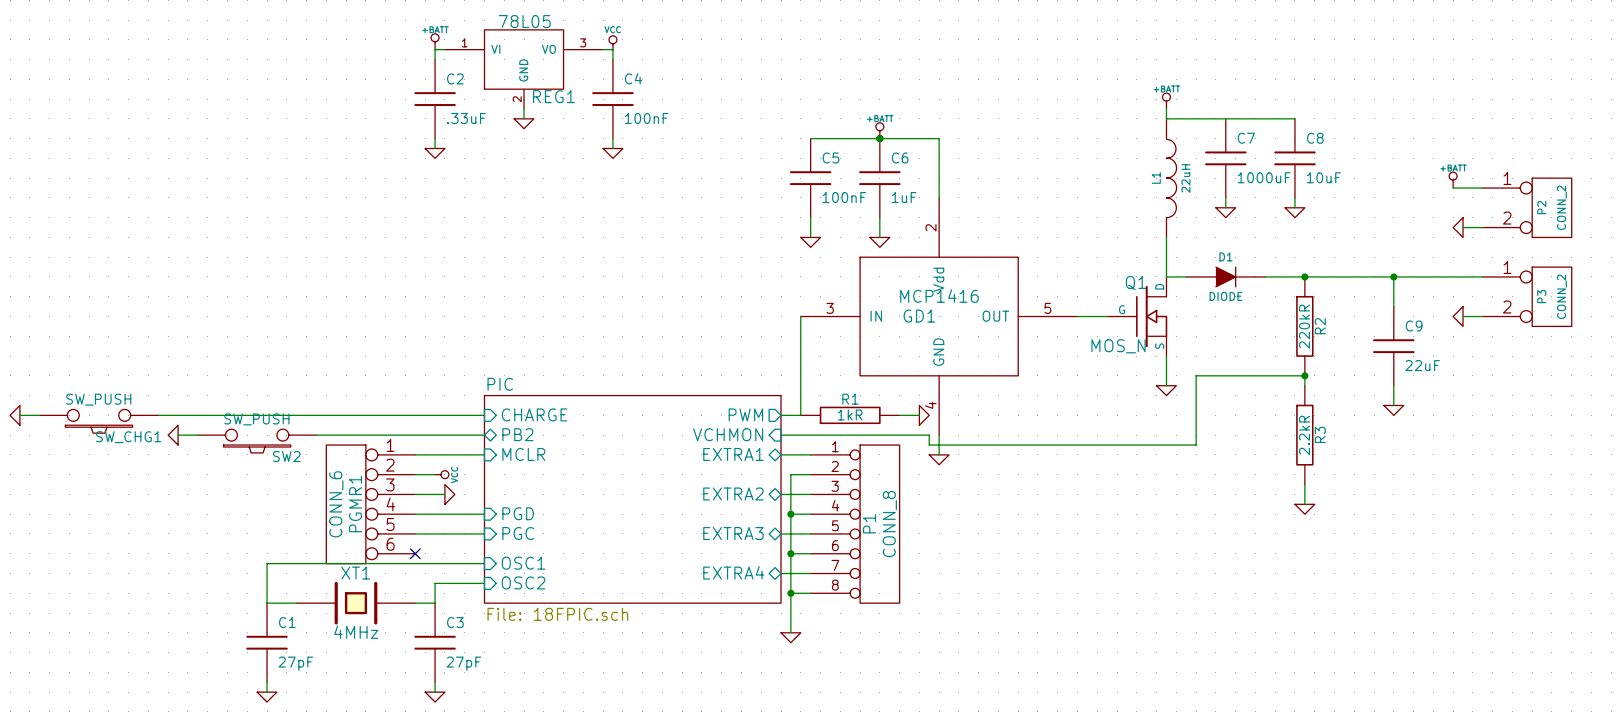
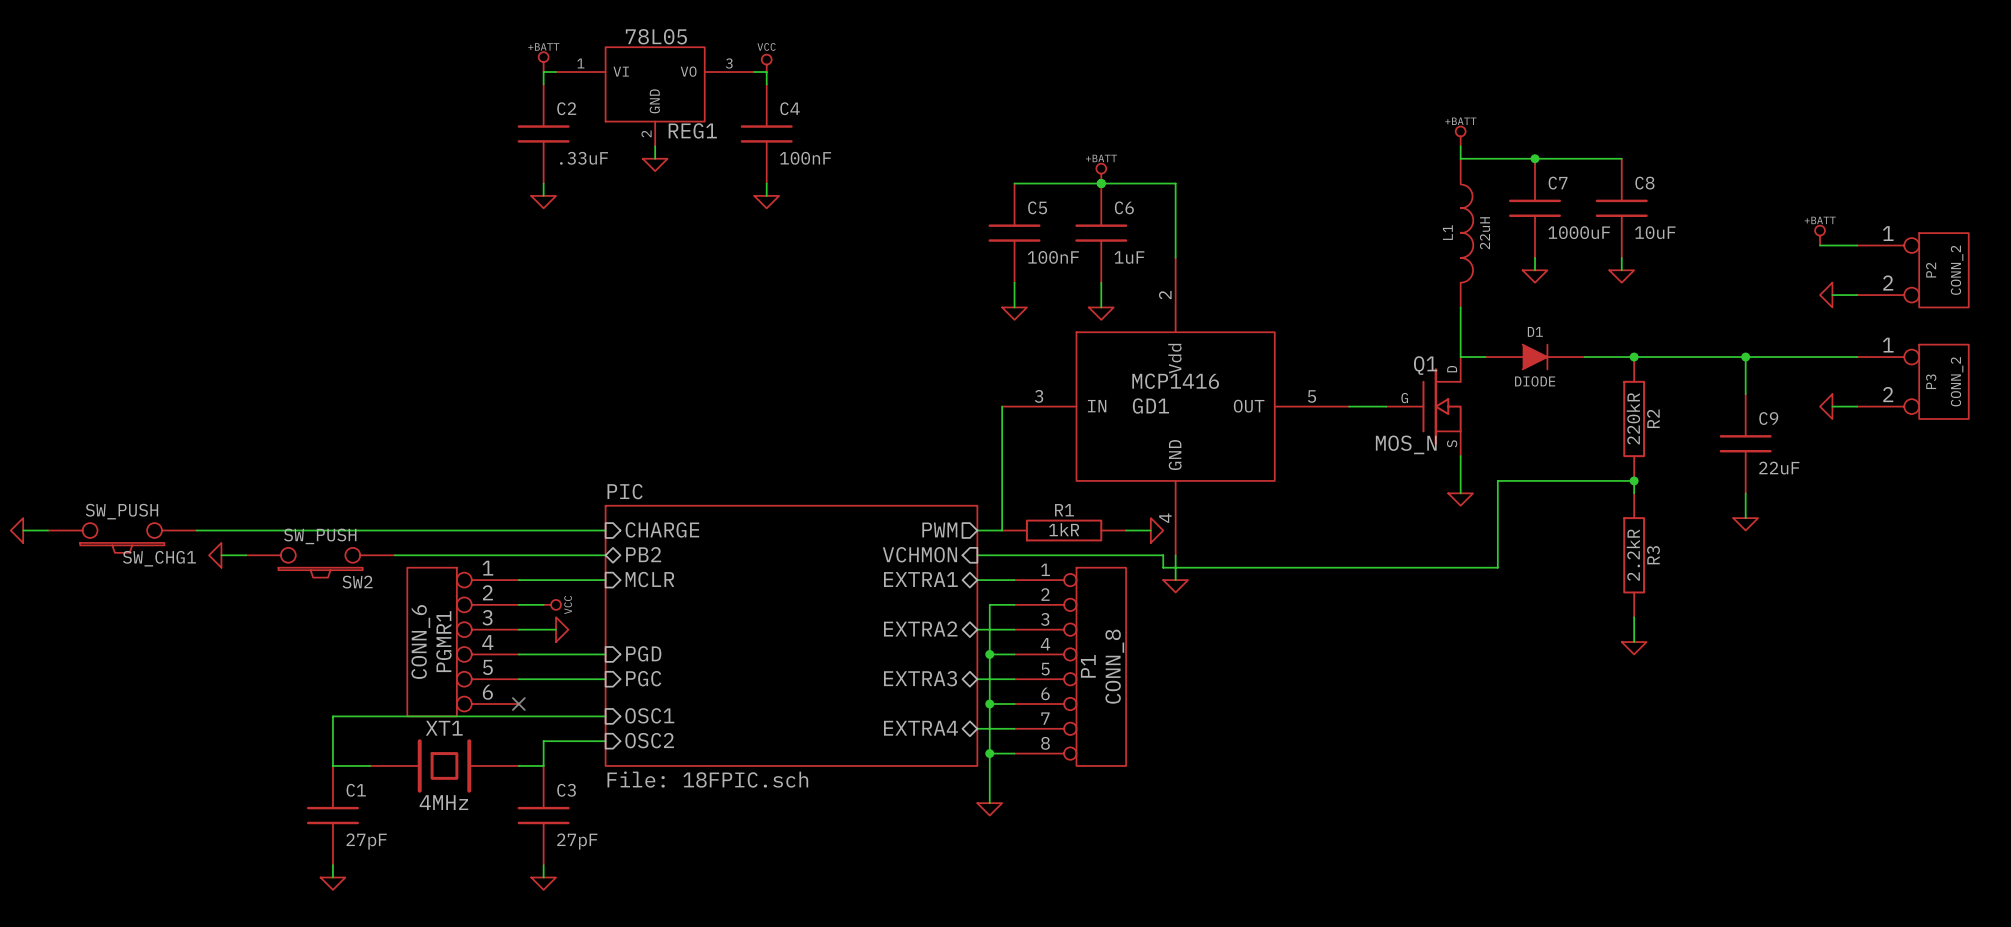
junction: none -> (1535, 158)

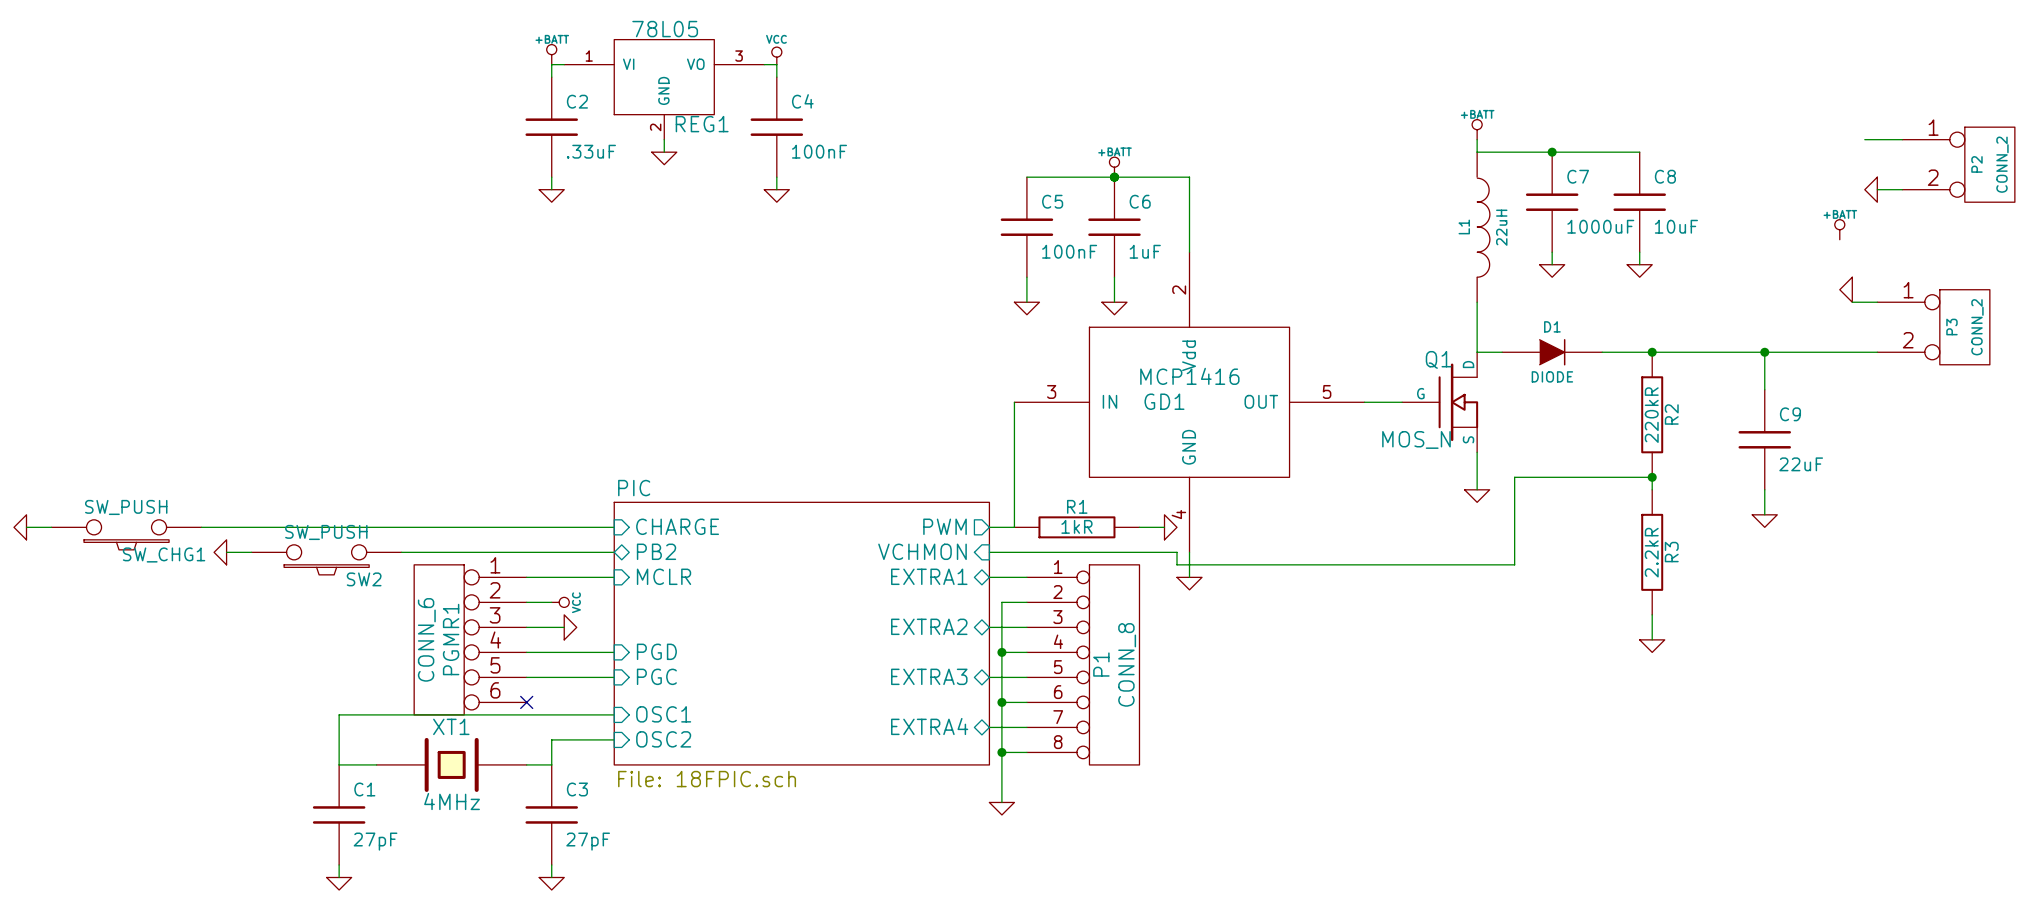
wire: (1820, 245) (1857, 245) -> (1864, 139) (1902, 139)
P2 position: (1912, 270) -> (1958, 164)
wire: (1832, 295) (1857, 295) -> (1877, 189) (1902, 189)
P3 position: (1912, 381) -> (1933, 327)
power symbol position: (1826, 406) -> (1871, 189)
wire: (1832, 406) (1857, 406) -> (1852, 302) (1877, 302)

